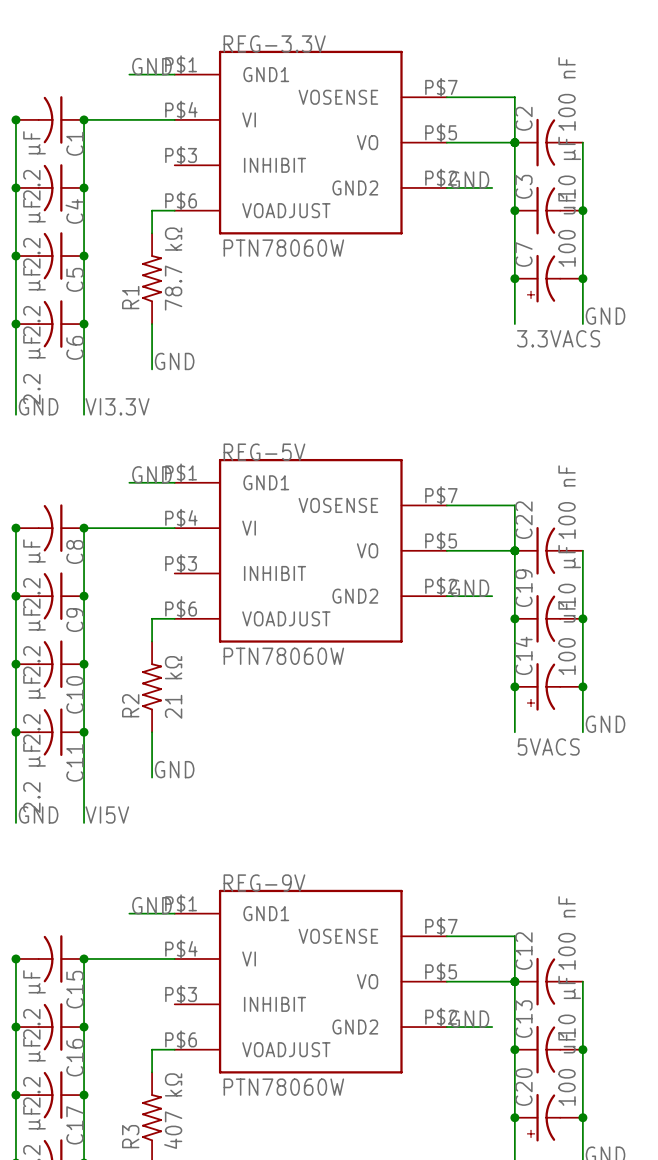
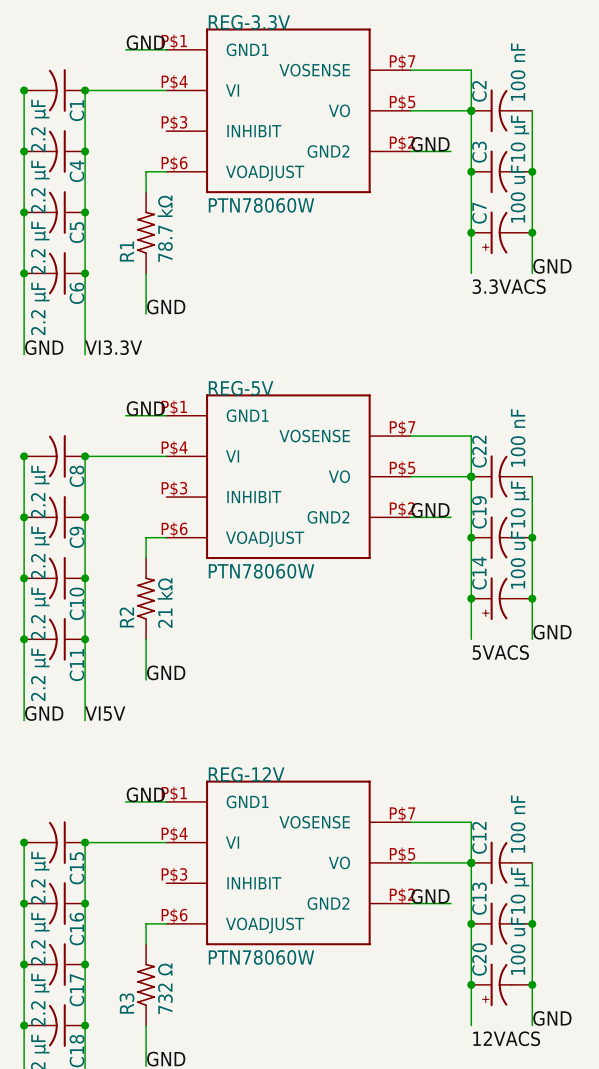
REG-9V name: REG-9V (264, 883) -> REG-12V (246, 774)
R3 value: 407 kΩ (173, 1111) -> 732 Ω (165, 988)

